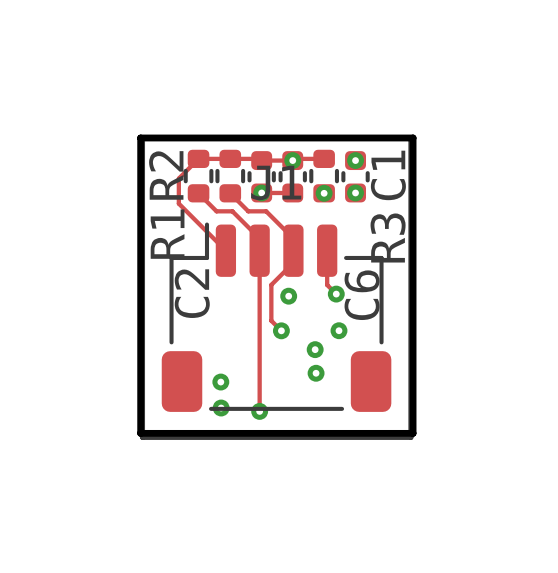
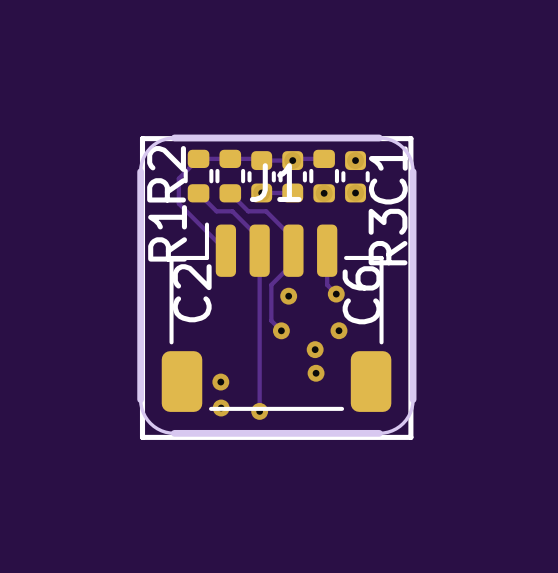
board edge: (174, 137) (140, 137) (140, 171) -> (174, 137) (161, 140) (150, 147) (143, 158) (140, 171)
board edge: (379, 137) (413, 137) (413, 171) -> (379, 137) (392, 140) (403, 147) (410, 158) (413, 171)
board edge: (140, 399) (140, 433) (174, 433) -> (140, 399) (143, 412) (150, 423) (161, 430) (174, 433)
board edge: (413, 399) (413, 433) (379, 433) -> (413, 399) (410, 412) (403, 423) (392, 430) (379, 433)

